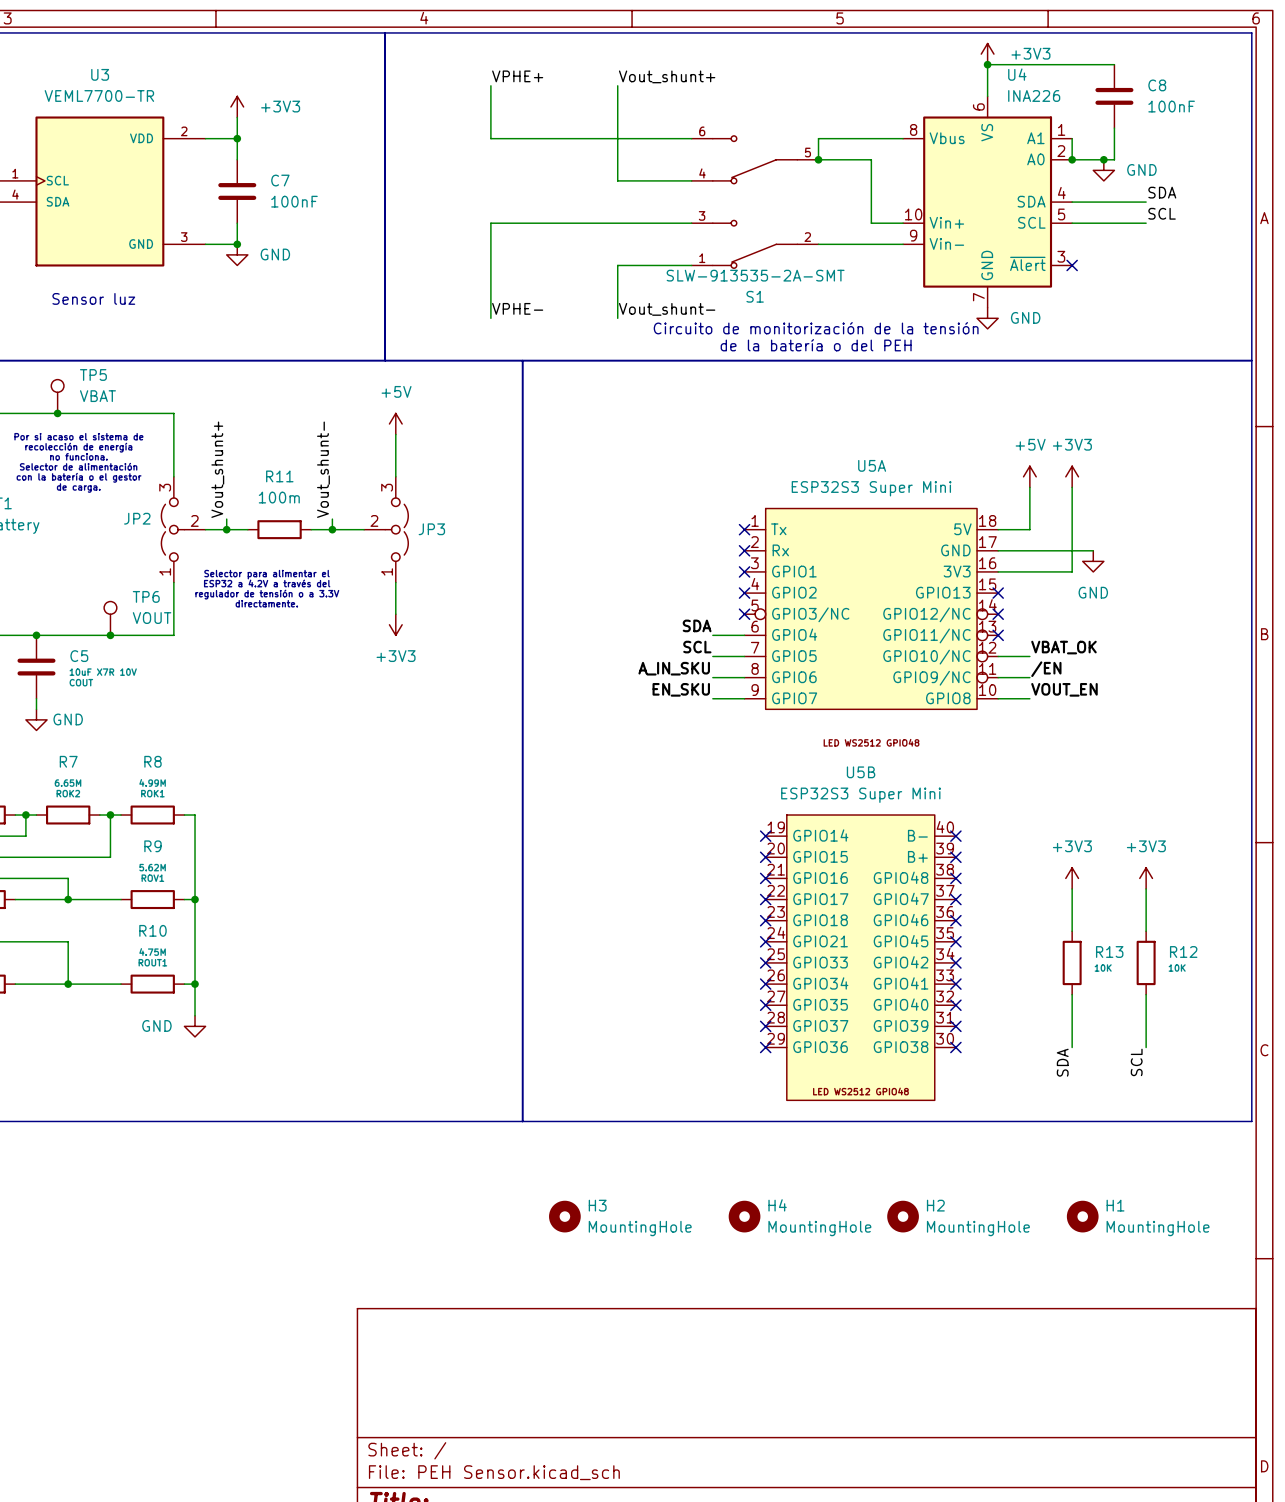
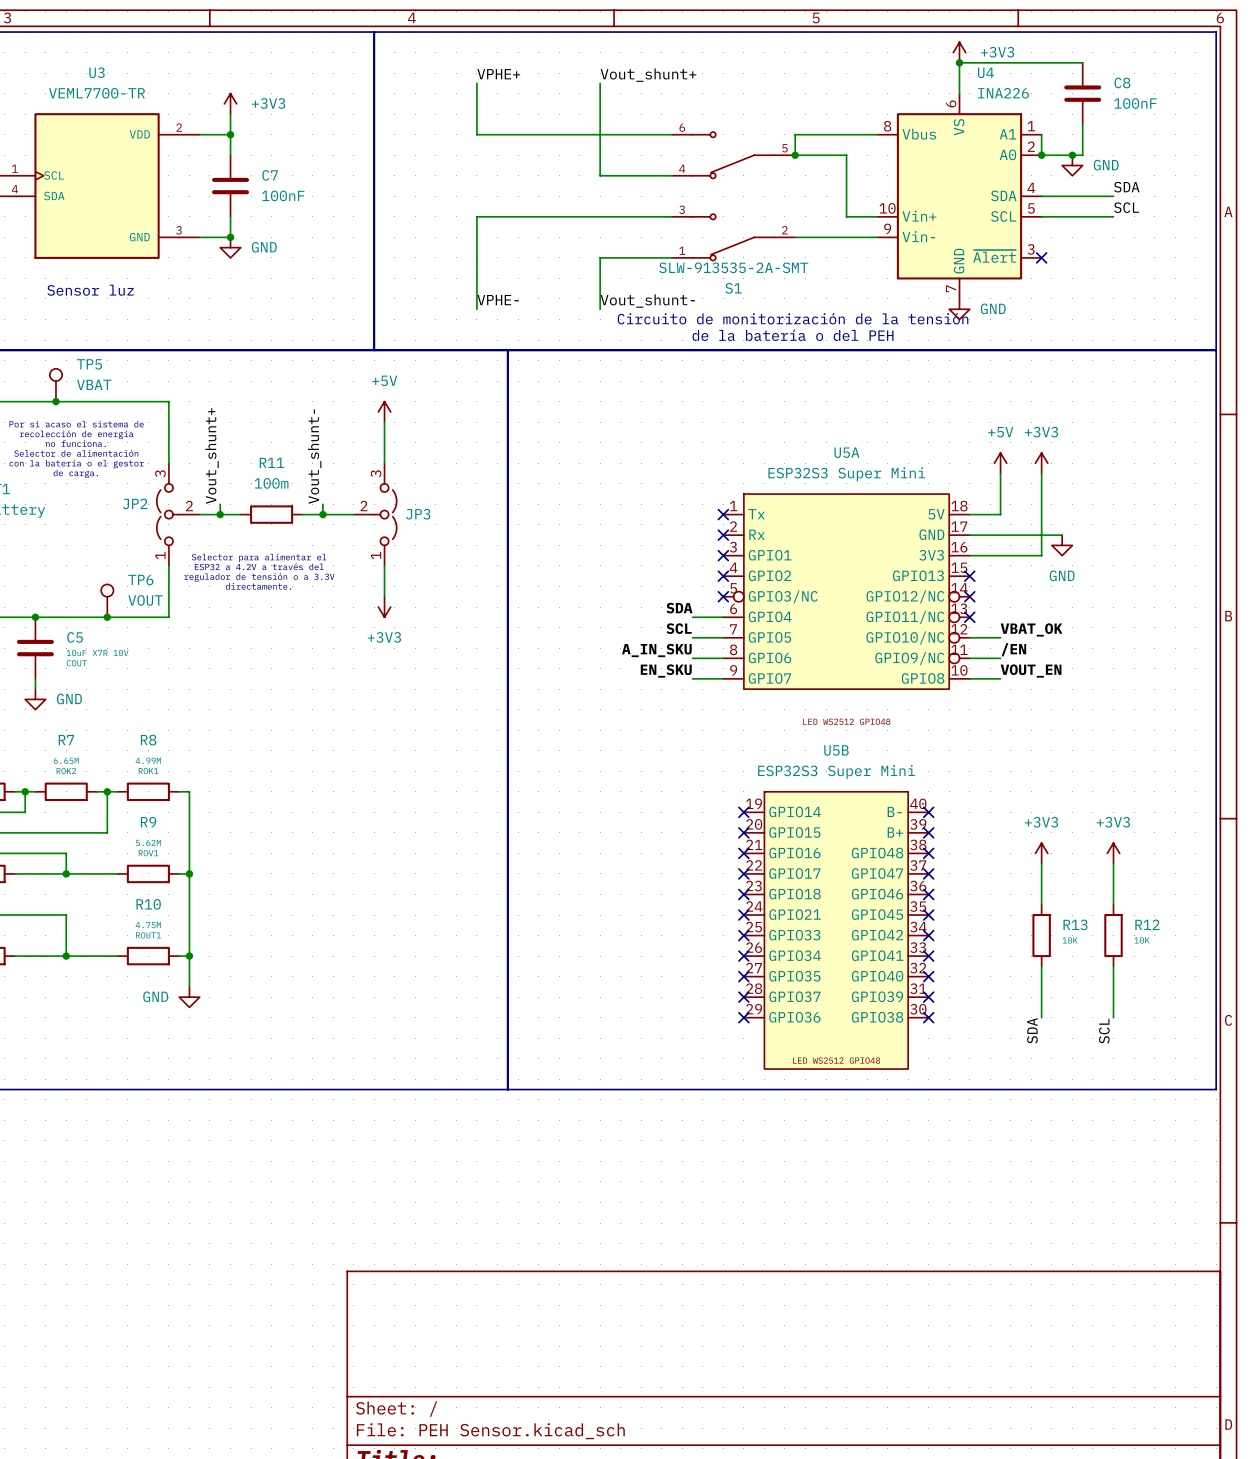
H3: MountingHole (564, 1216) -> none
H4: MountingHole (744, 1216) -> none
H2: MountingHole (903, 1216) -> none
H1: MountingHole (1082, 1216) -> none

